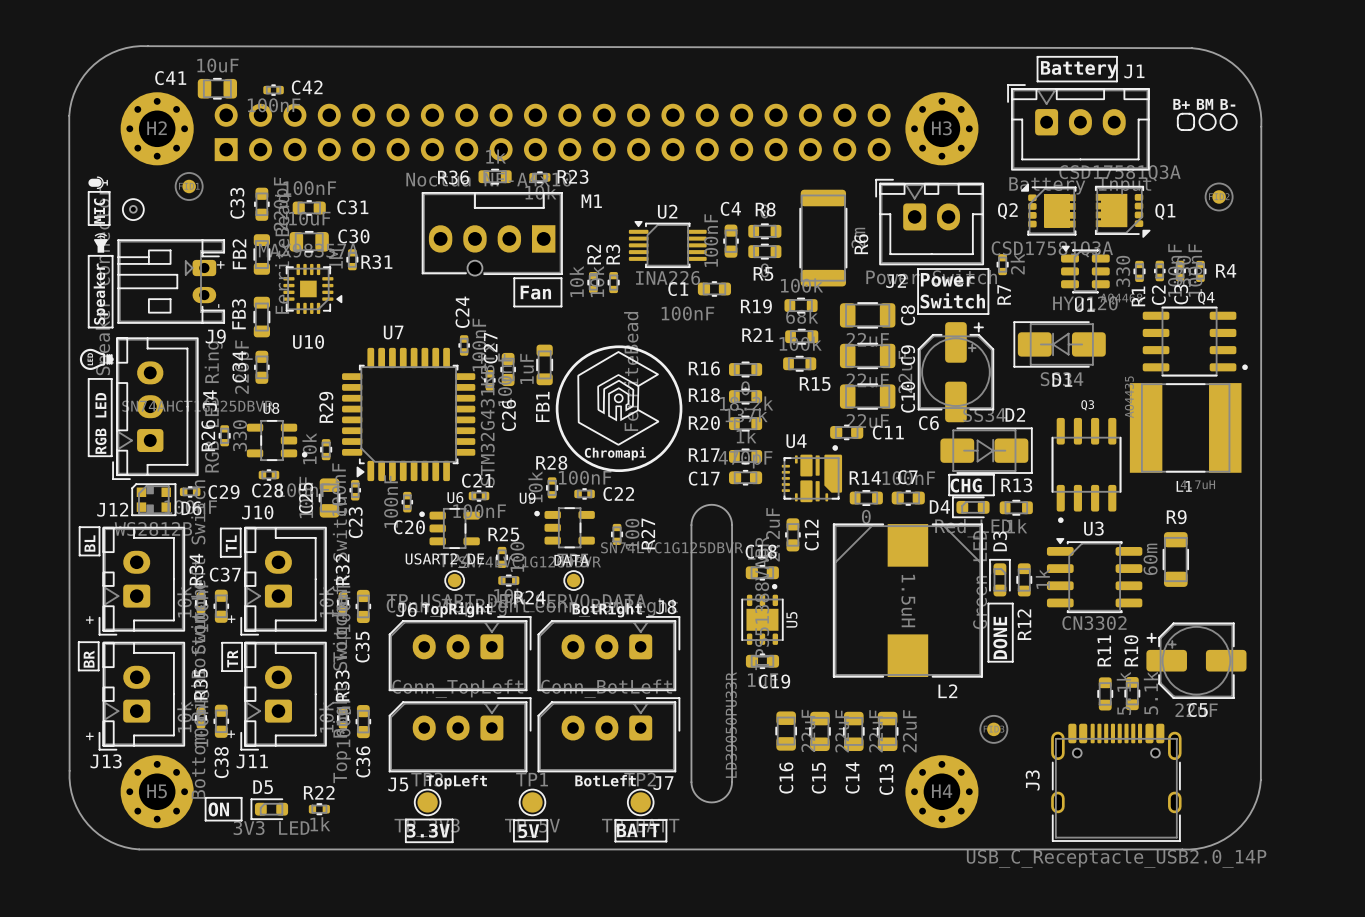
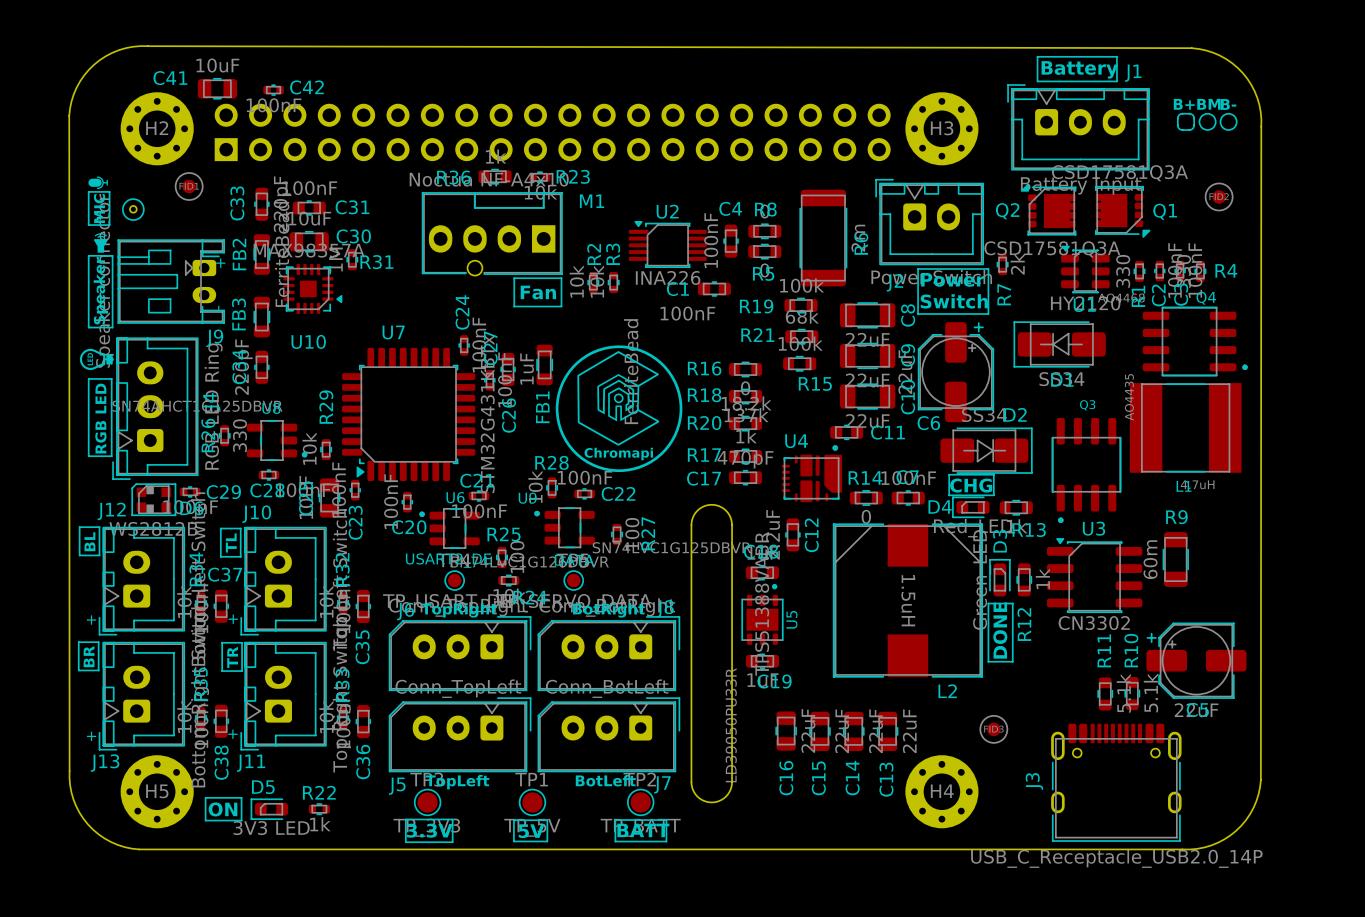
R13 name position: R13 (1016, 485) -> R13 (1029, 529)

